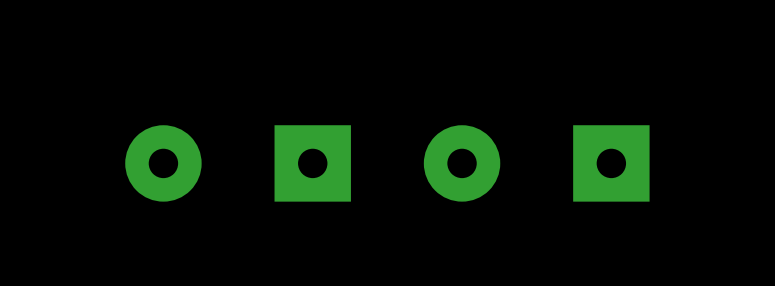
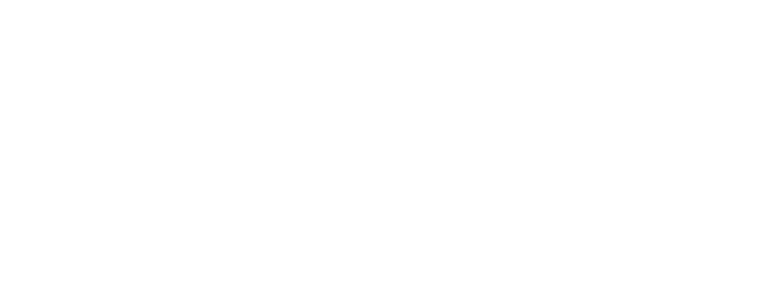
part: (238, 163) -> none
part: (536, 163) -> none

